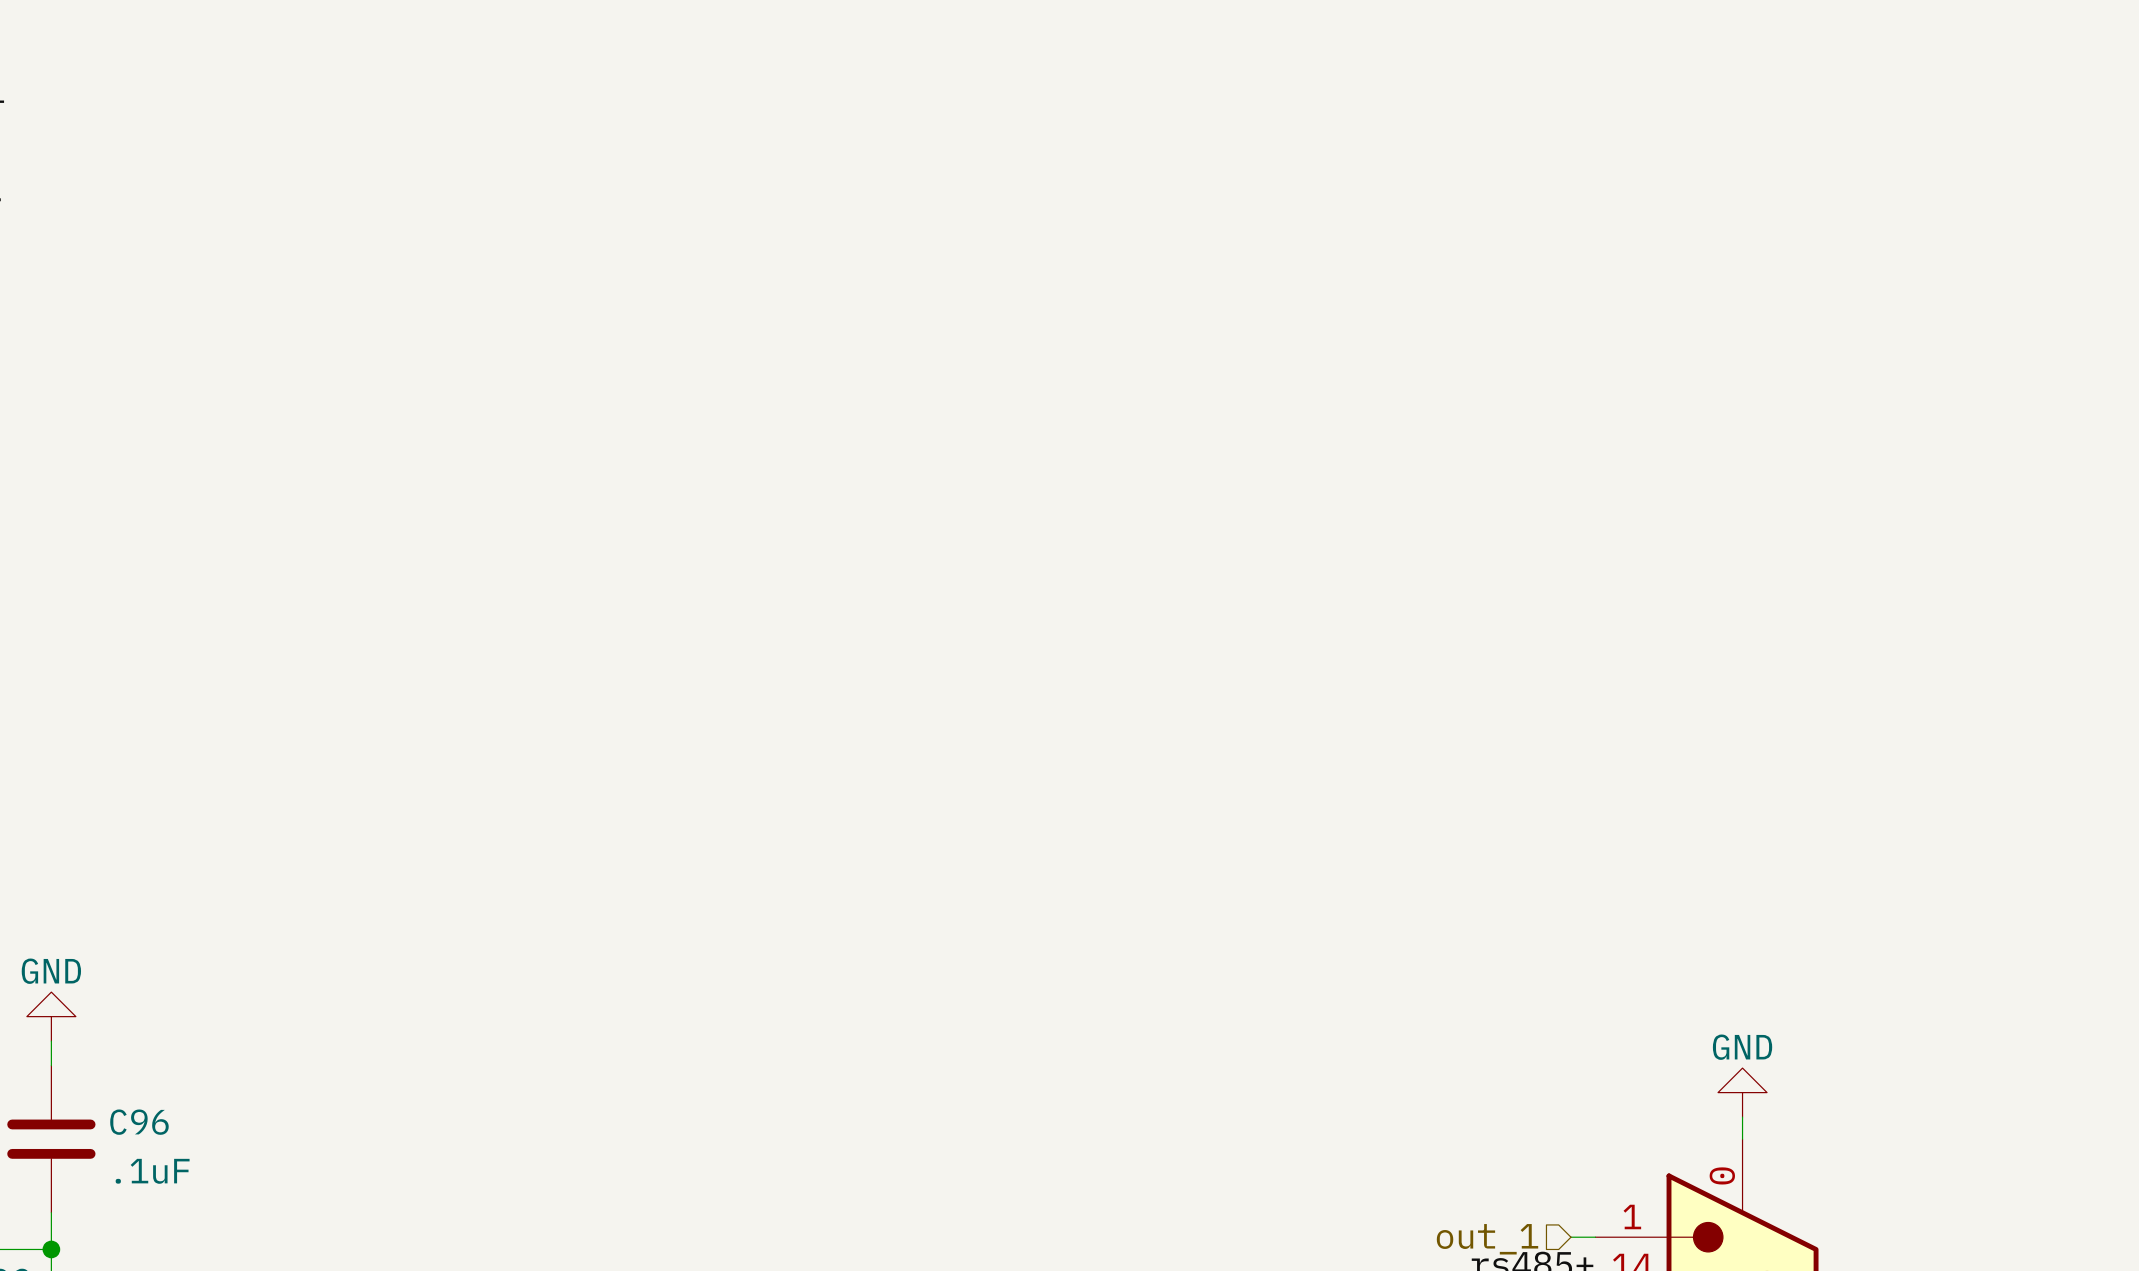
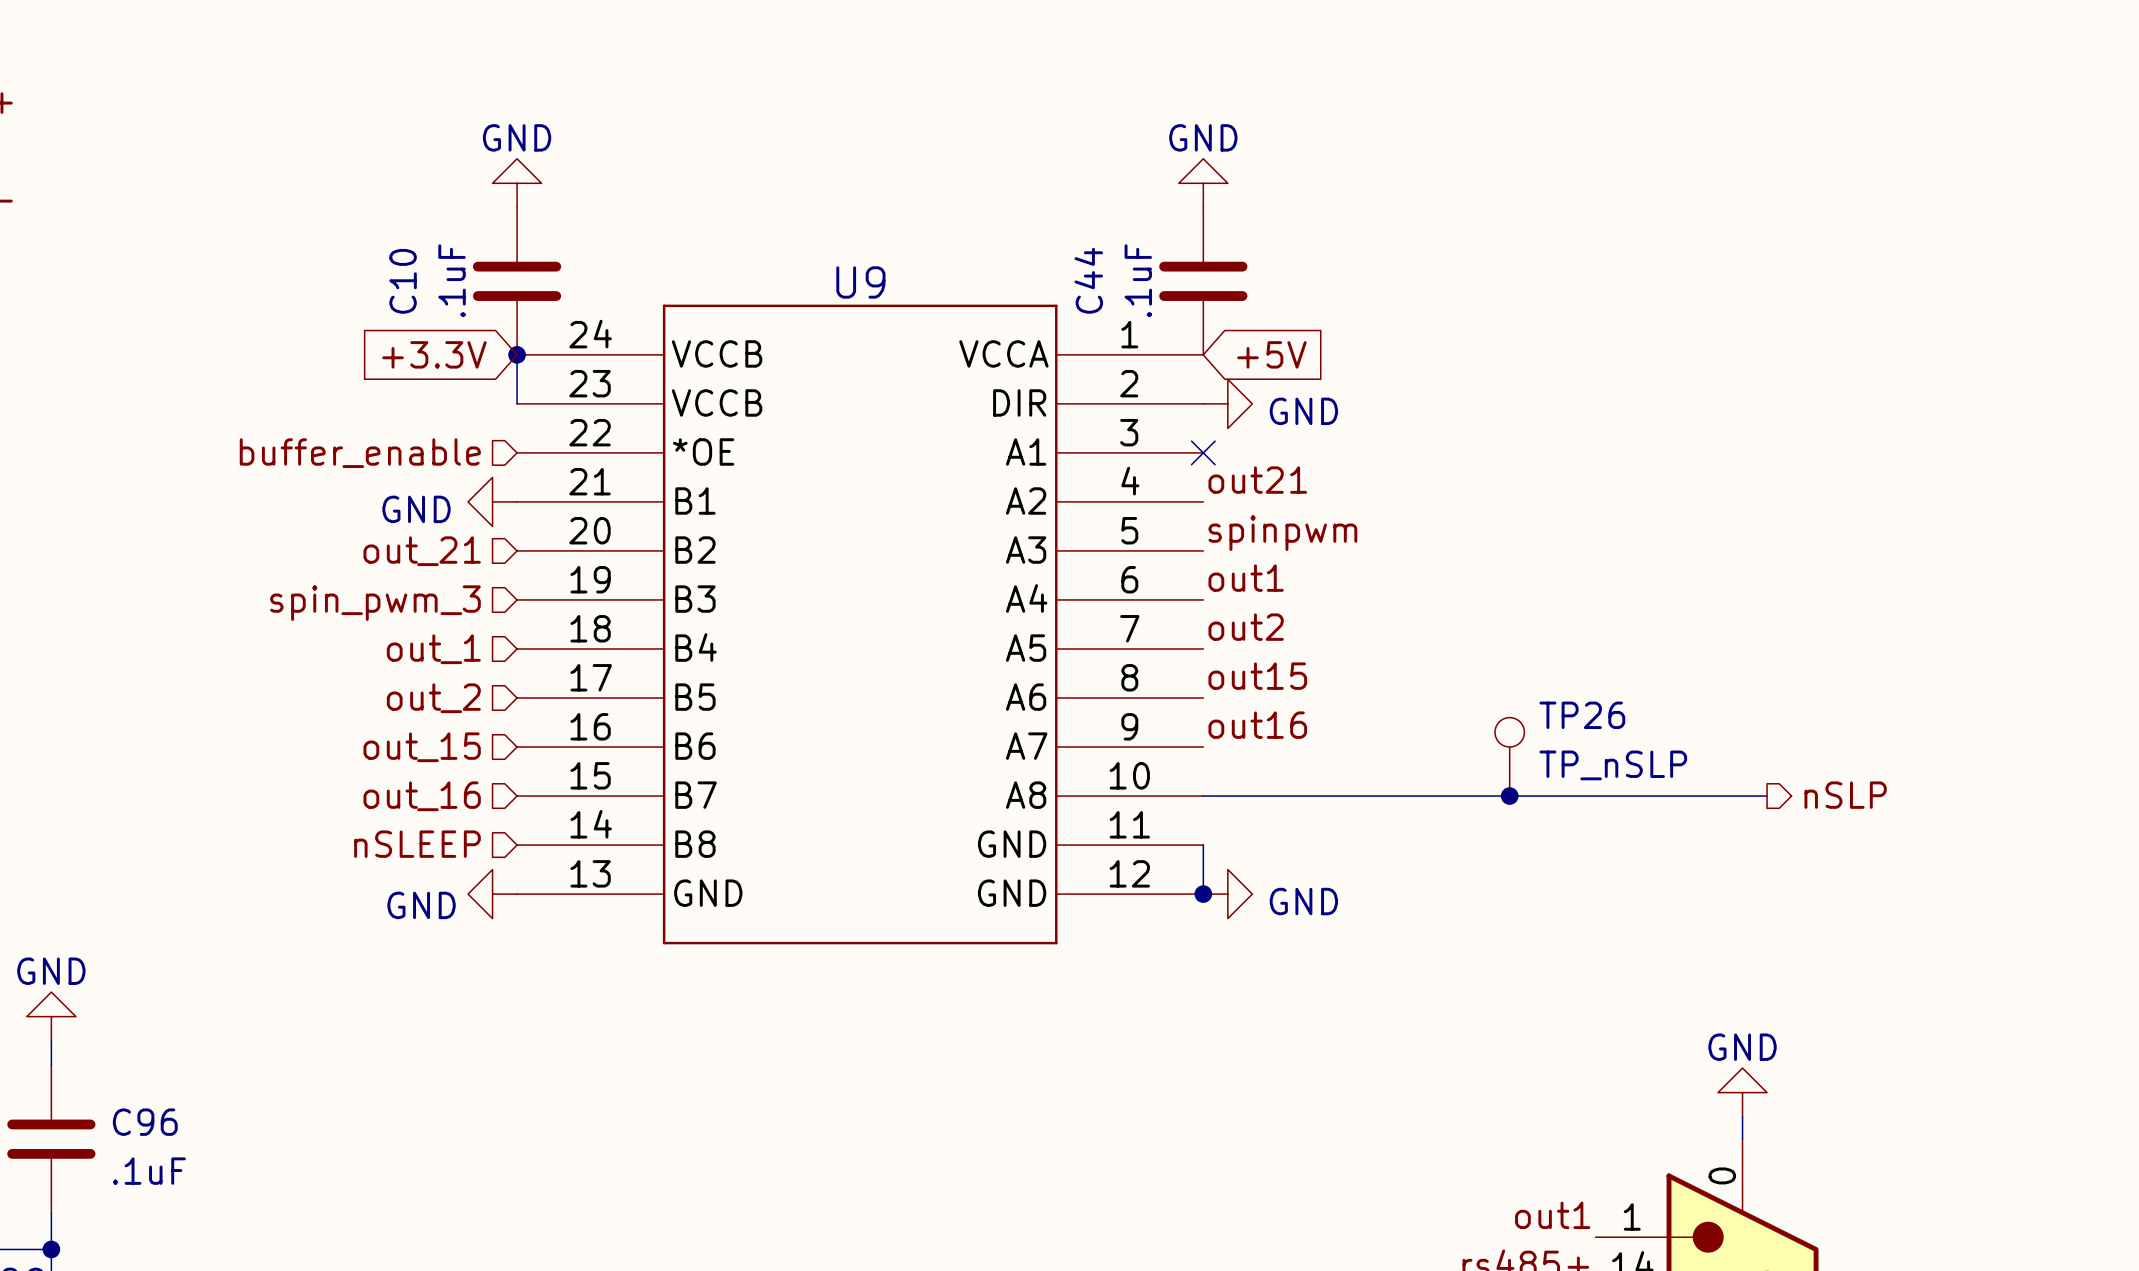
power symbol: none -> GND (517, 183)
power symbol: none -> GND (1203, 183)
C10: none -> .1uF (517, 281)
C44: none -> .1uF (1203, 281)
global label: none -> +3.3V (434, 354)
wire: none -> (517, 354) (517, 403)
junction: none -> (517, 354)
global label: none -> +5V (1271, 354)
power symbol: none -> GND (1227, 403)
no-connect mark: none -> (1203, 452)
hierarchical label: none -> buffer_enable (360, 453)
label: none -> out21 (1257, 480)
power symbol: none -> GND (492, 501)
label: none -> spinpwm (1282, 533)
hierarchical label: none -> out_21 (422, 551)
label: none -> out1 (1246, 578)
hierarchical label: none -> spin_pwm_3 (375, 603)
U9: none -> (860, 624)
label: none -> out2 (1246, 627)
hierarchical label: none -> out_1 (433, 649)
label: none -> out15 (1257, 676)
hierarchical label: none -> out_2 (433, 698)
label: none -> out16 (1257, 725)
hierarchical label: none -> out_15 (422, 747)
TP26: none -> TP_nSLP (1509, 756)
hierarchical label: none -> nSLP (1845, 795)
wire: none -> (1203, 796) (1767, 796)
junction: none -> (1509, 796)
hierarchical label: none -> out_16 (422, 796)
hierarchical label: none -> nSLEEP (417, 844)
wire: none -> (1203, 845) (1203, 894)
power symbol: none -> GND (492, 894)
junction: none -> (1203, 894)
power symbol: none -> GND (1227, 894)
label: none -> out1 (1552, 1215)
wire: (1570, 1237) (1595, 1237) -> none
hierarchical label: out_1 (1487, 1239) -> none

